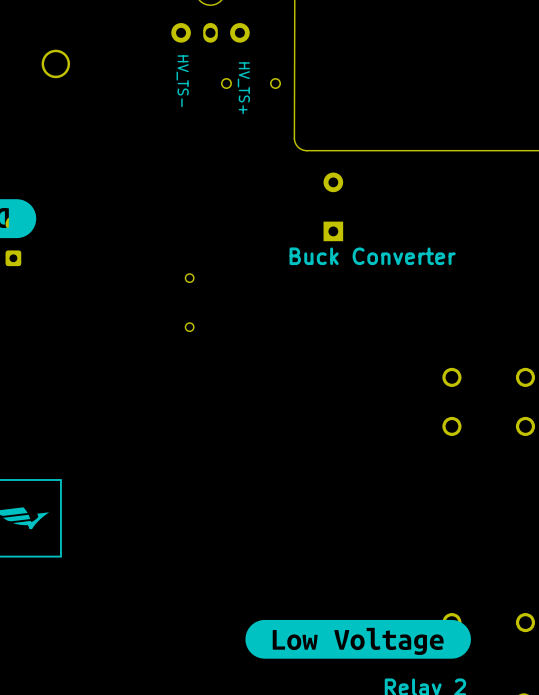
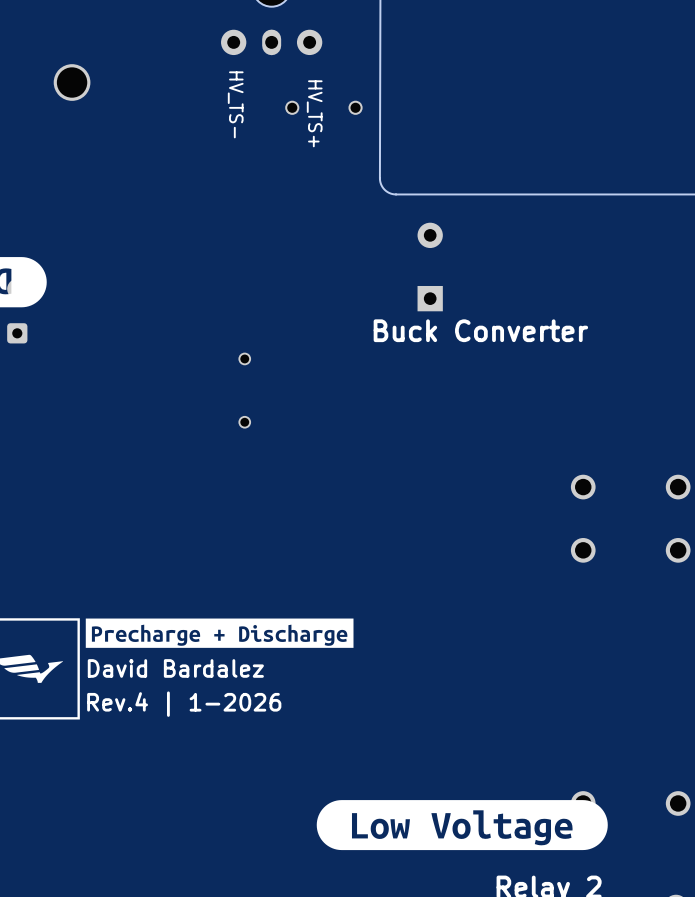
drawing: none -> [85, 618, 354, 648]
text: none -> David Bardalez (175, 668)
text: none -> Rev.4 | 1-2026 (184, 704)

